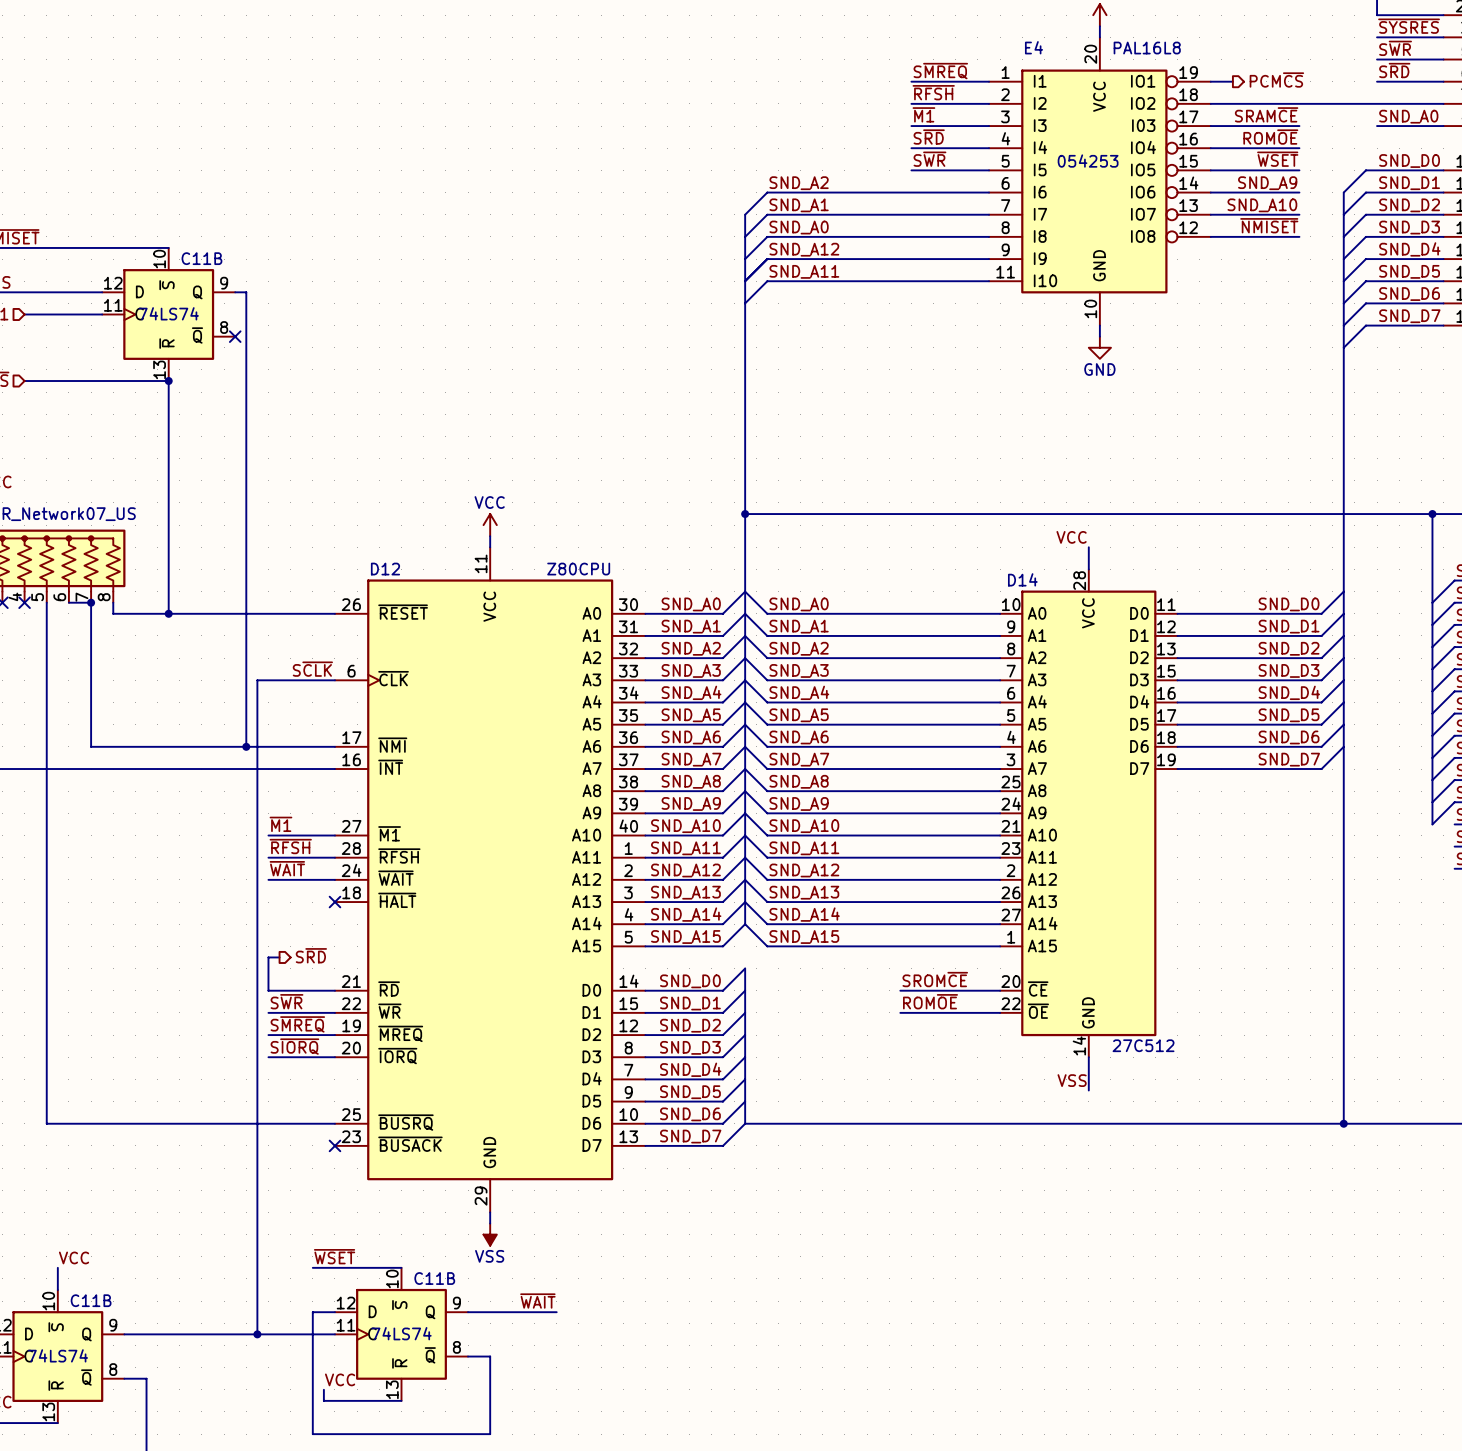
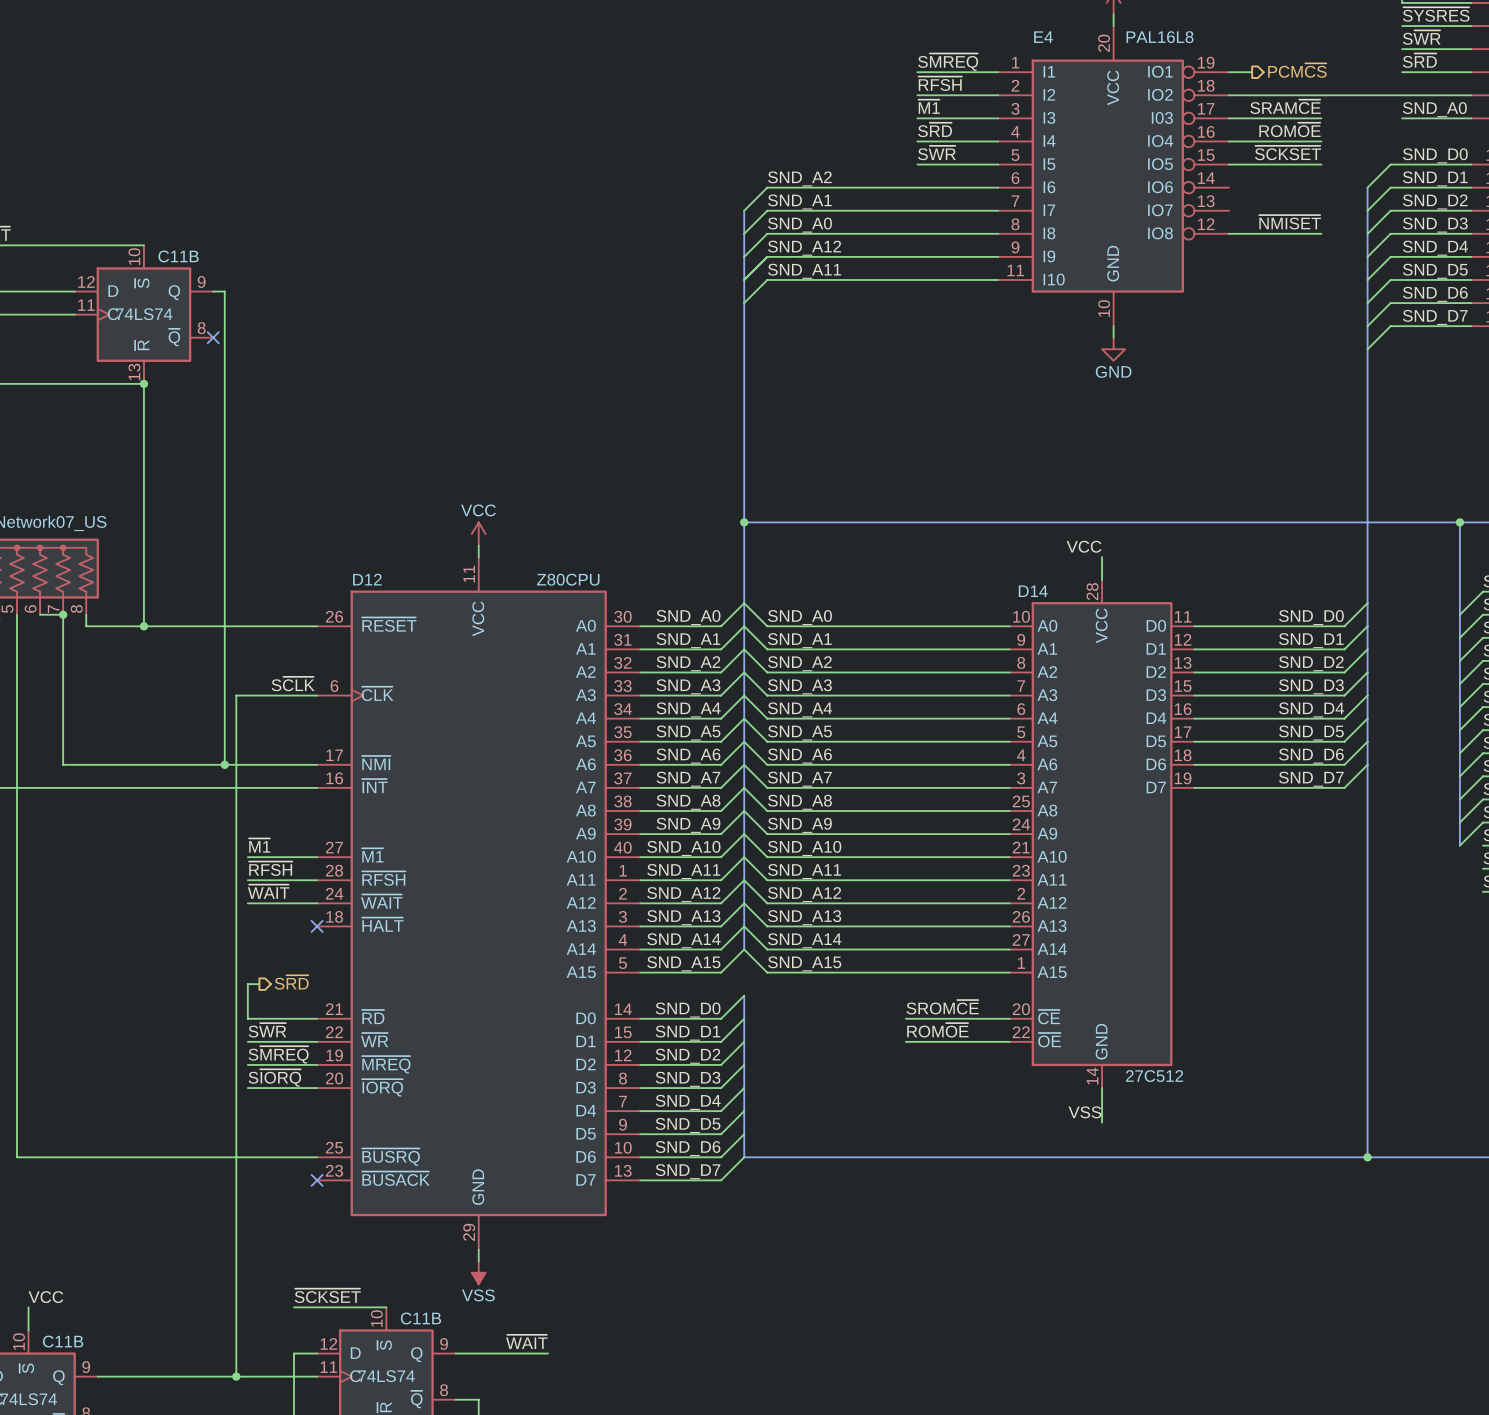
label: ~{WSET} (1277, 159) -> ~{SCKSET} (1288, 153)
text: 054253 (1088, 161) -> none
label: SND_A9 (1267, 183) -> none
wire: (1210, 192) (1299, 192) -> none
label: SND_A10 (1262, 205) -> none
wire: (1210, 214) (1299, 214) -> none
label: ~{WSET} (334, 1256) -> ~{SCKSET} (327, 1295)

